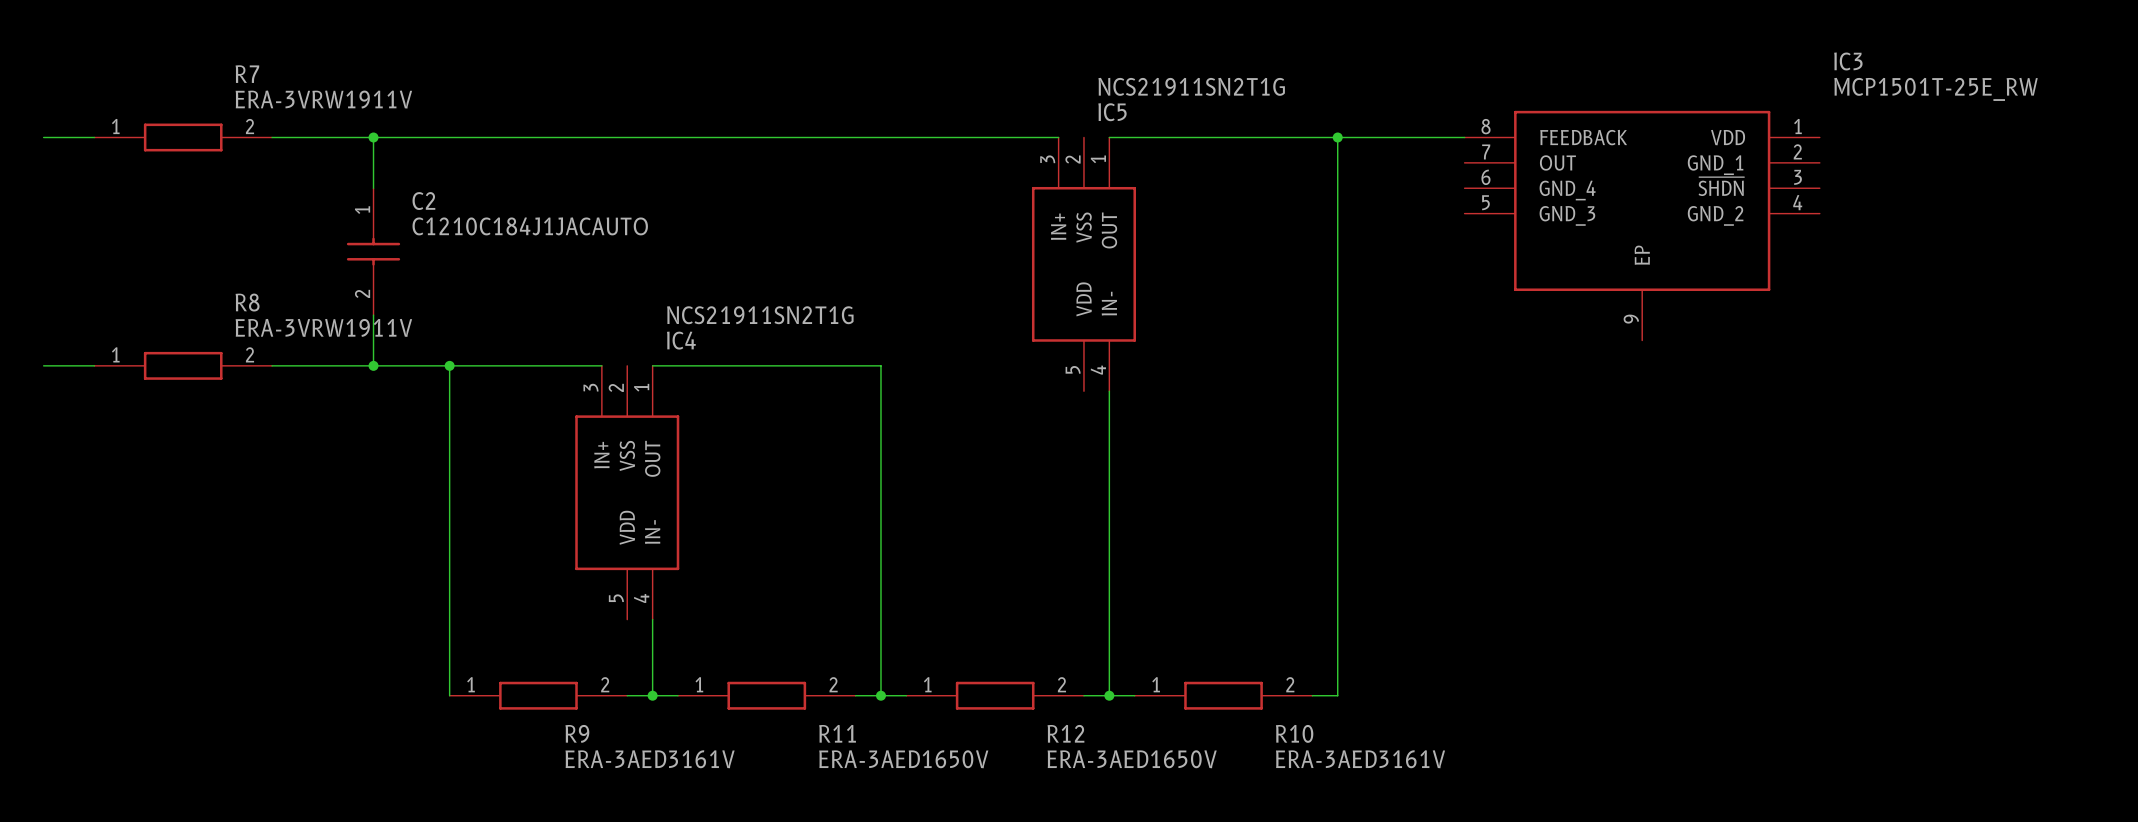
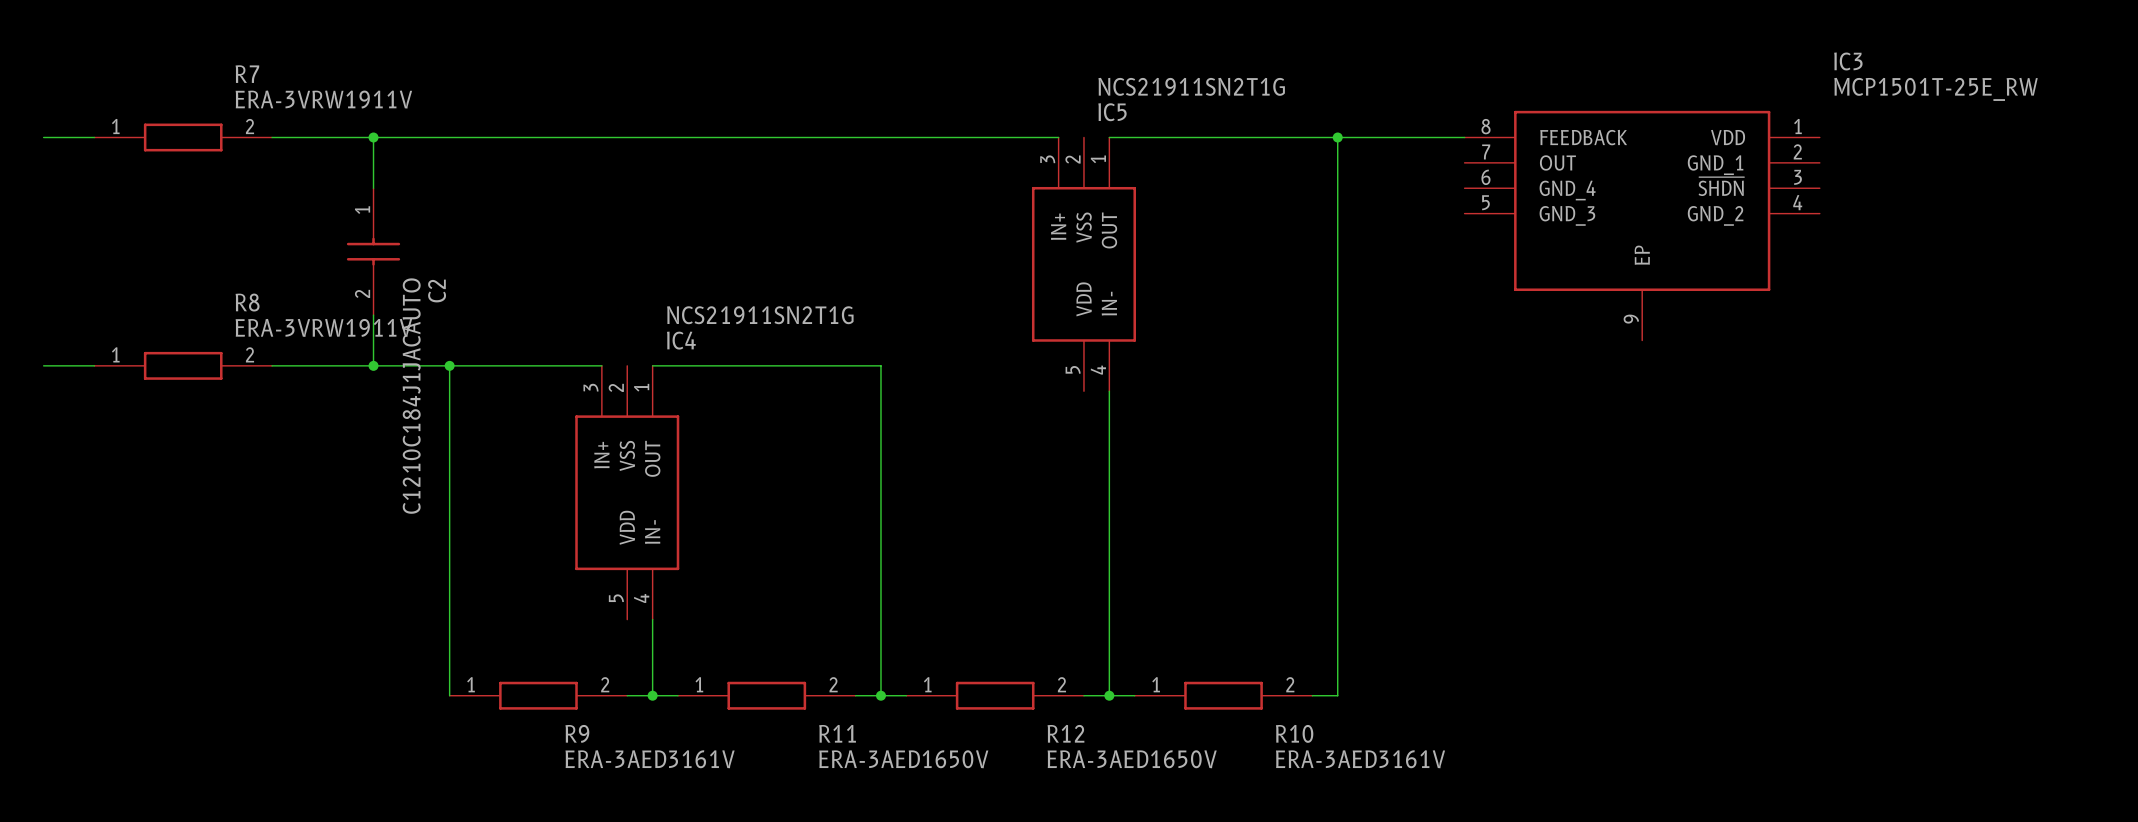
C2 name rotation: 0° (423, 201) -> 90° counterclockwise (437, 291)
C2 name position: C2 (423, 201) -> C2 (437, 291)
C2 value rotation: 0° (530, 226) -> 90° counterclockwise (411, 396)

